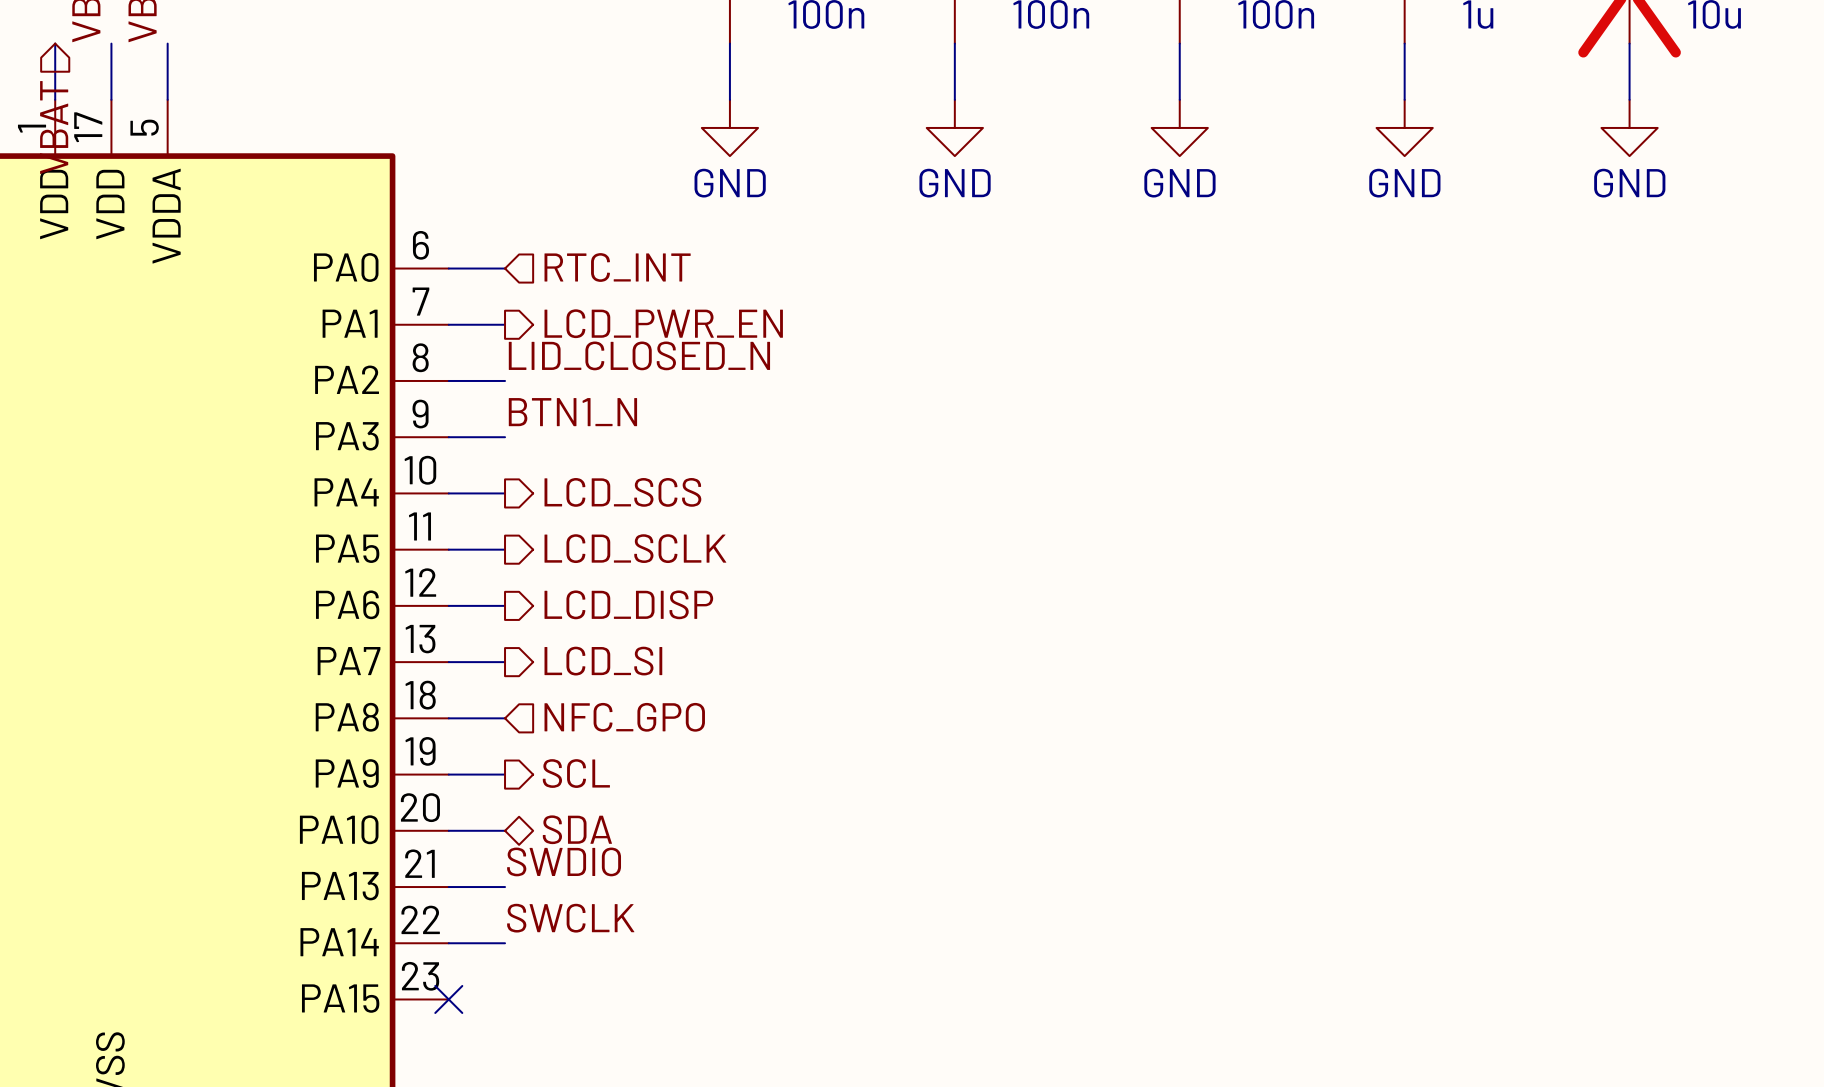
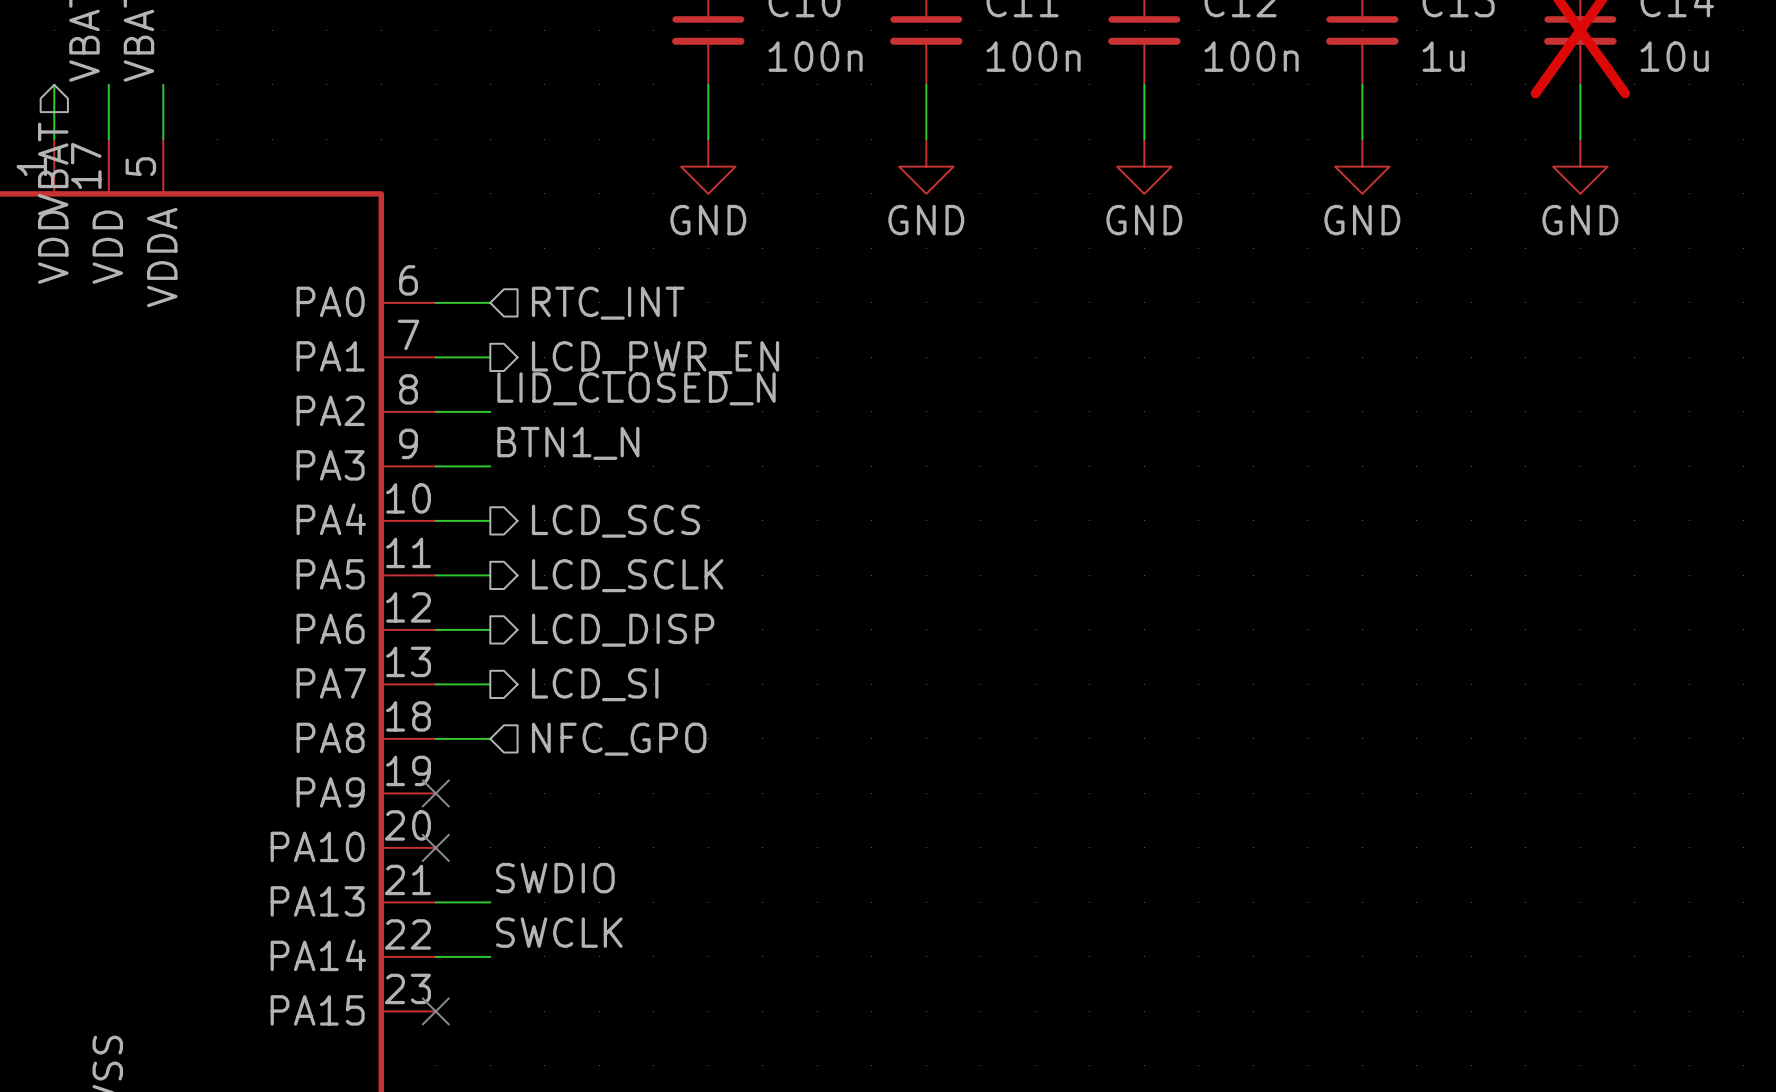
hierarchical label: SCL (576, 773) -> none
wire: (448, 774) (505, 774) -> none
no-connect mark: none -> (435, 793)
hierarchical label: SDA (577, 829) -> none
wire: (448, 830) (505, 830) -> none
no-connect mark: none -> (435, 847)

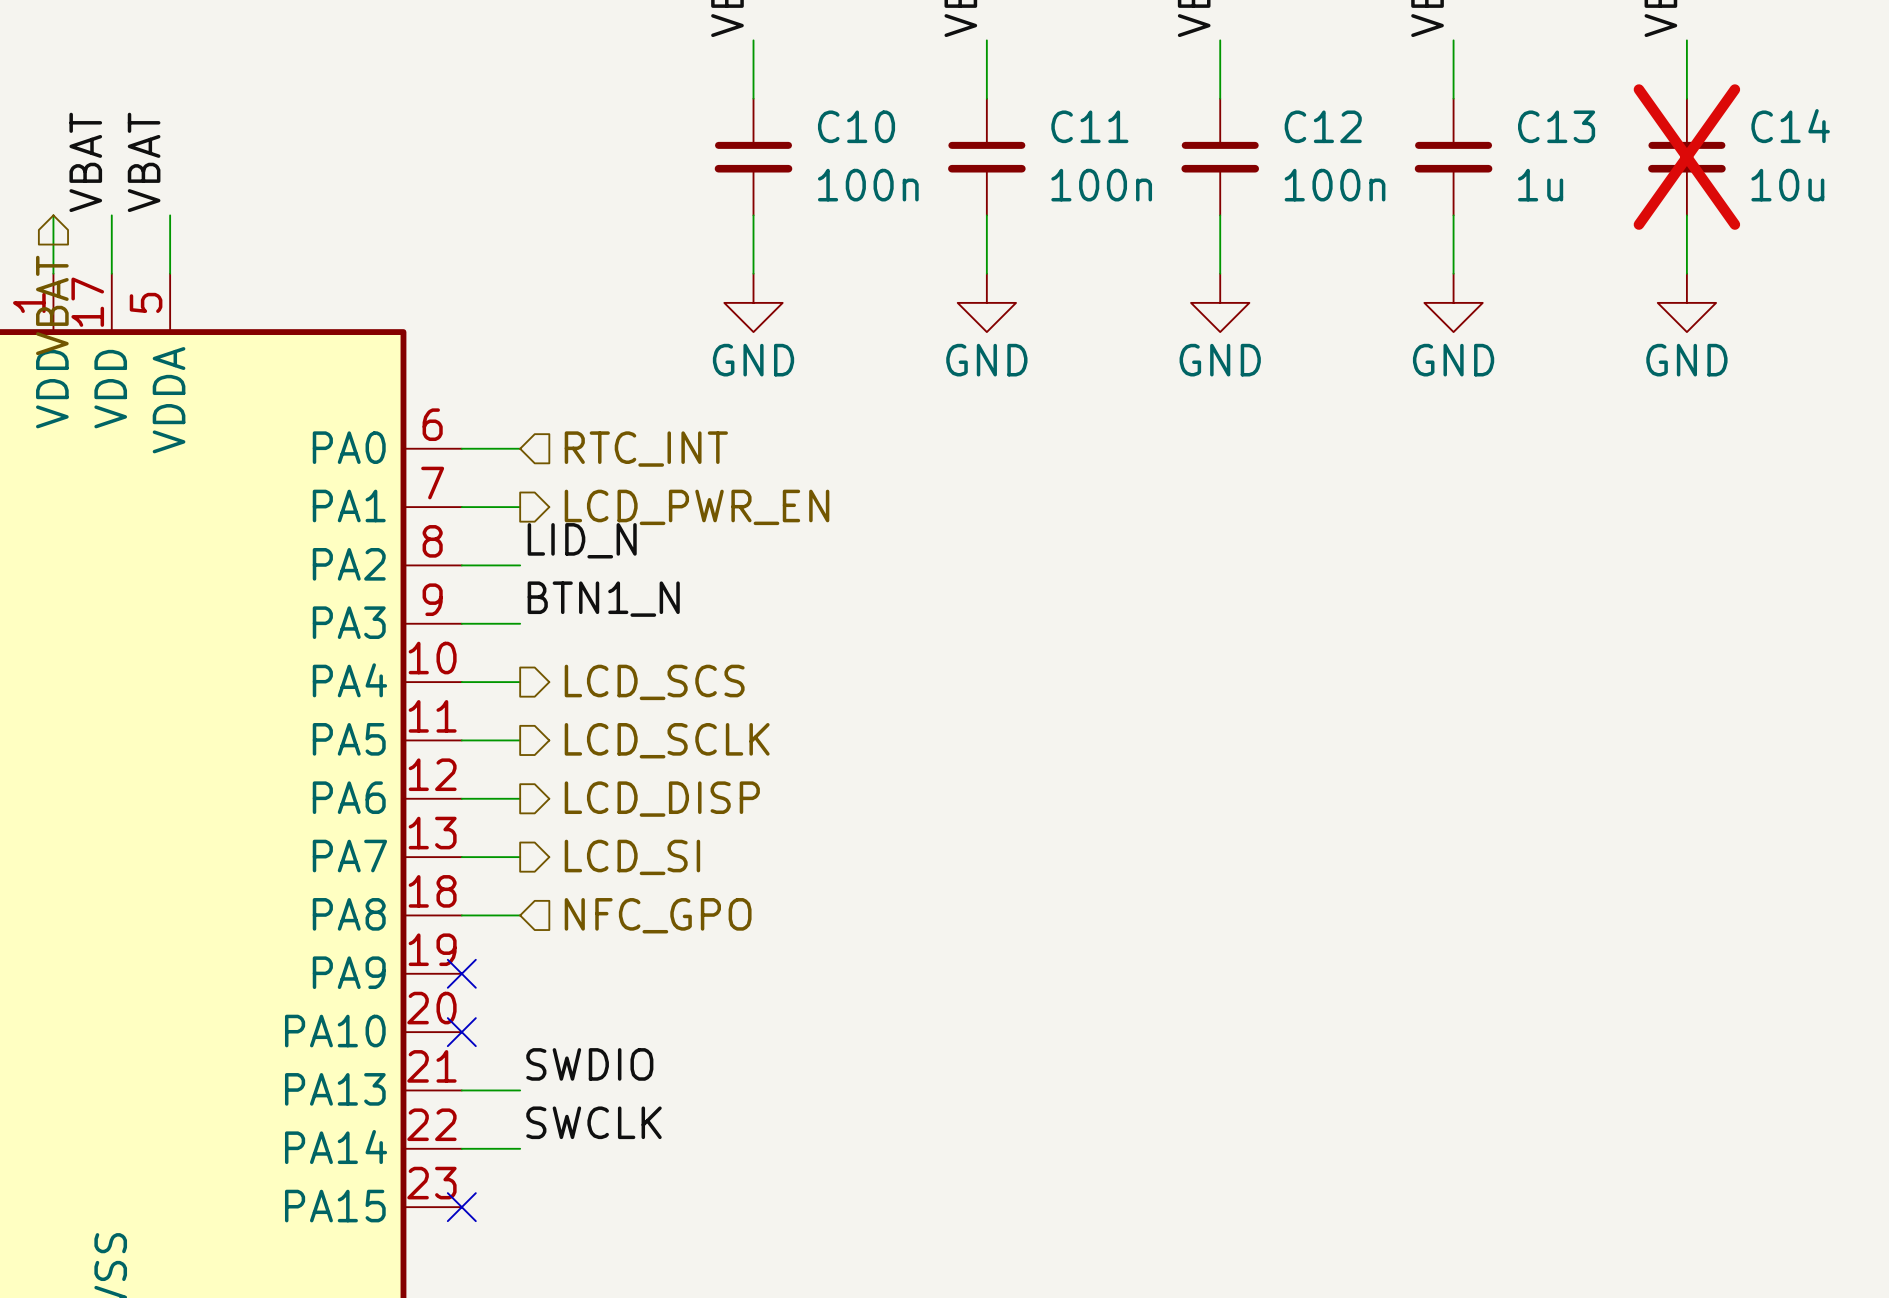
label: LID_CLOSED_N (636, 388) -> LID_N (582, 540)

